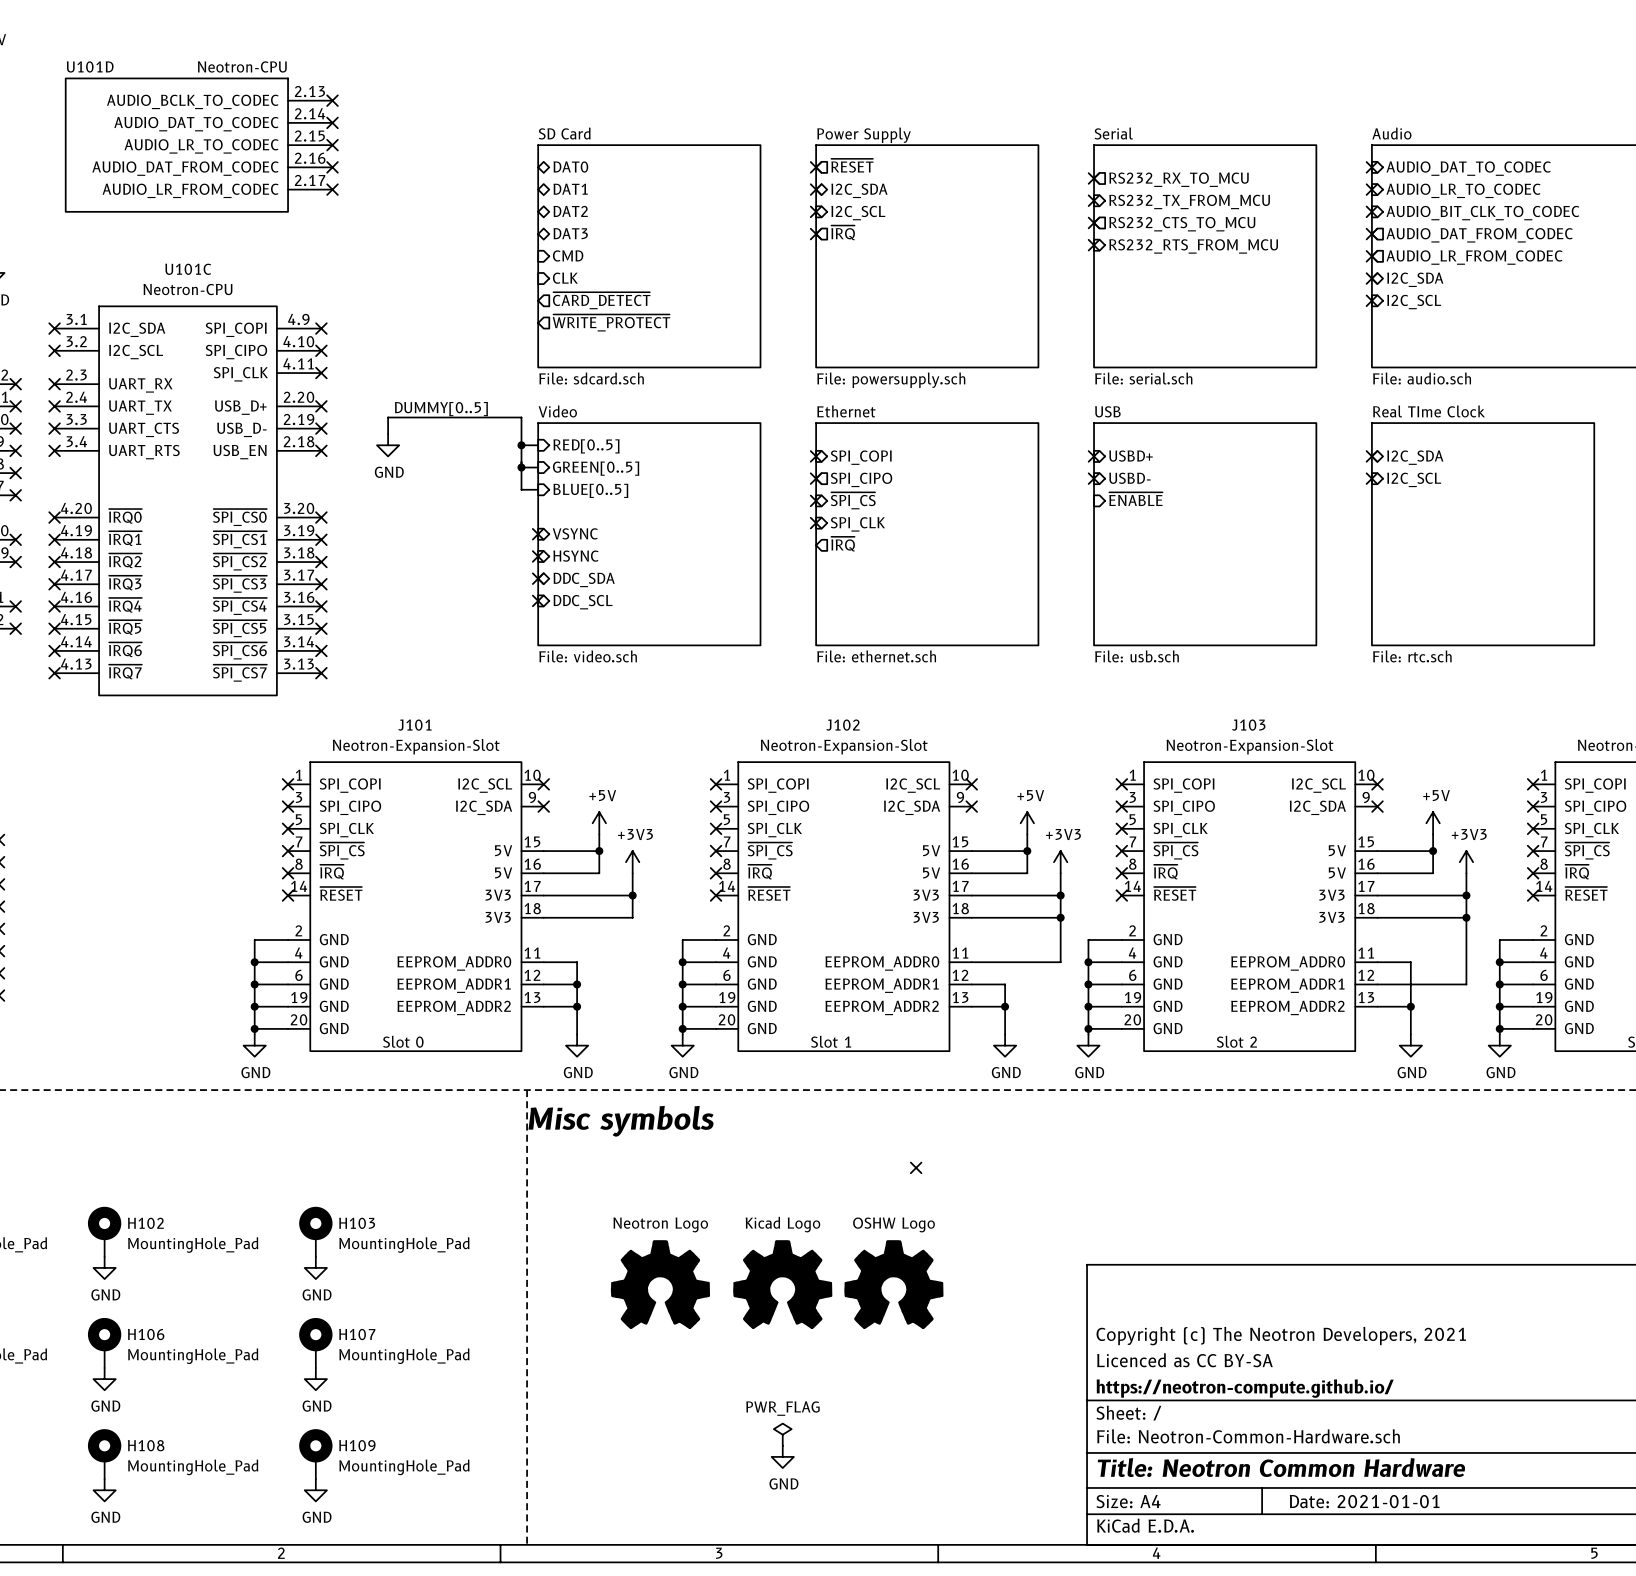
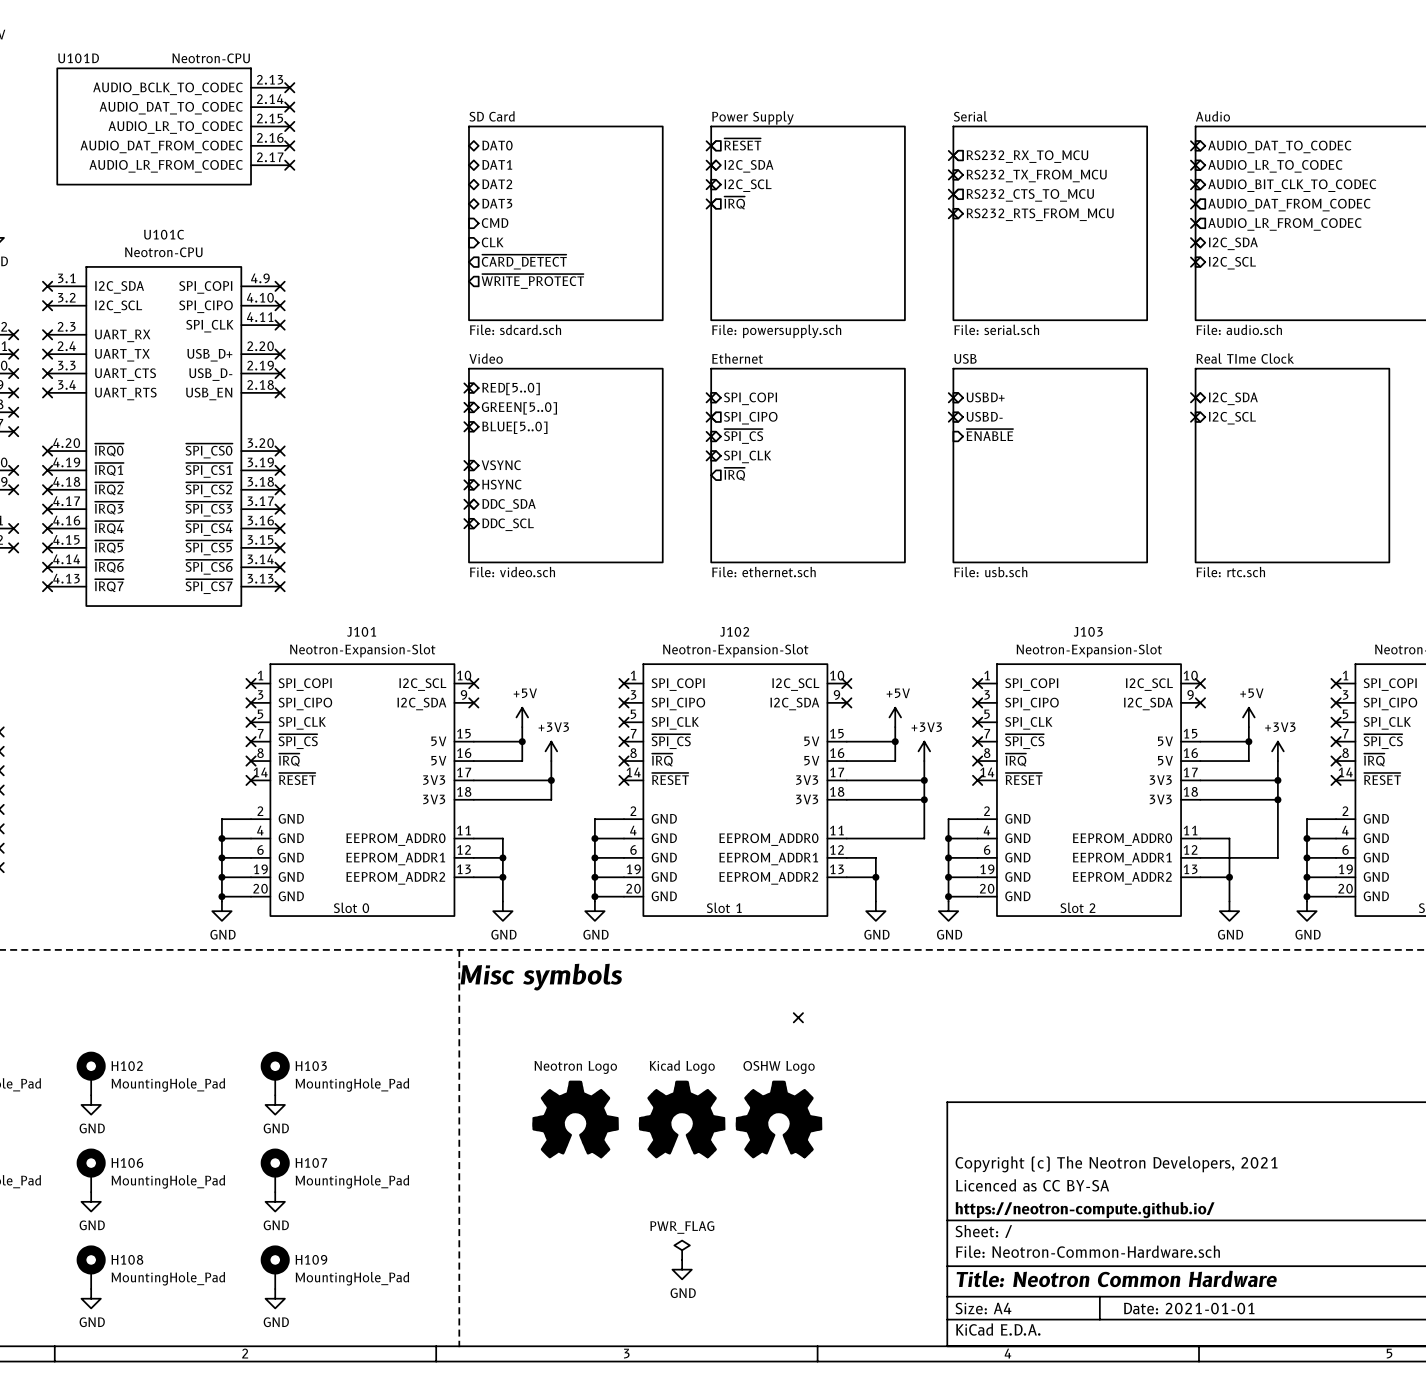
label: DUMMY[0..5] (441, 409) -> none
bus: (388, 434) (388, 417) (521, 417) (521, 489) (538, 489) -> none
power symbol: GND (388, 445) -> none
bus: (521, 445) (538, 445) -> none
junction: (521, 445) -> none
no-connect mark: none -> (468, 388)
sheet pin: RED[0..5] (586, 446) -> RED[5..0] (511, 389)
bus: (521, 467) (538, 467) -> none
junction: (521, 467) -> none
no-connect mark: none -> (468, 407)
sheet pin: GREEN[0..5] (596, 468) -> GREEN[5..0] (519, 408)
no-connect mark: none -> (468, 426)
sheet pin: BLUE[0..5] (590, 490) -> BLUE[5..0] (514, 427)

